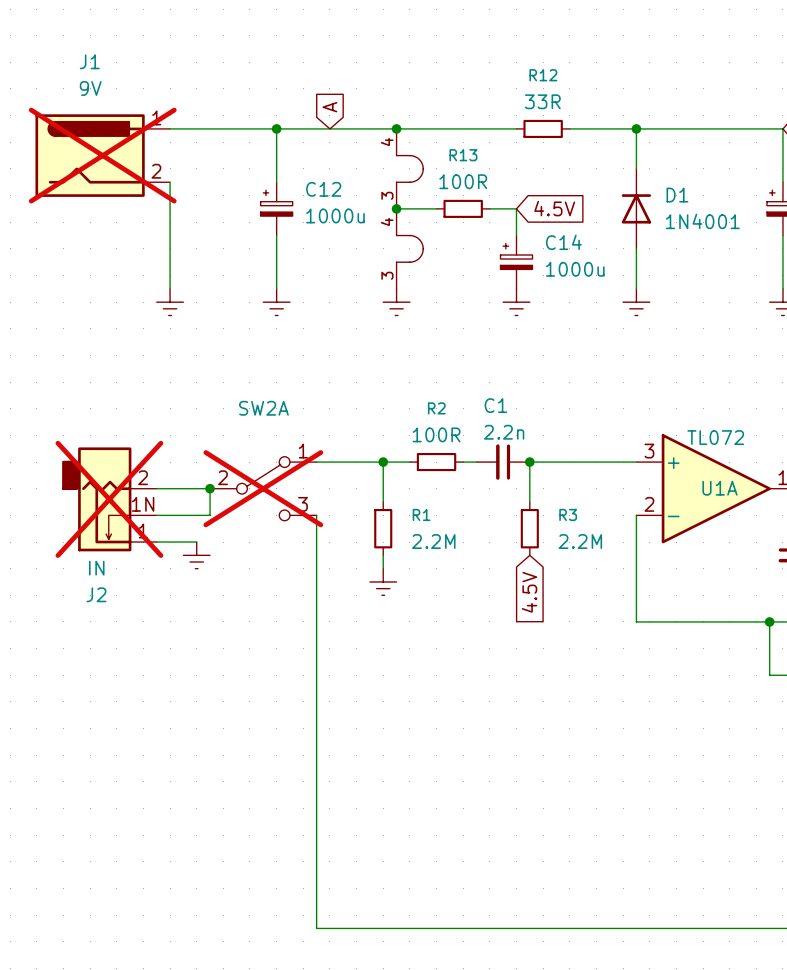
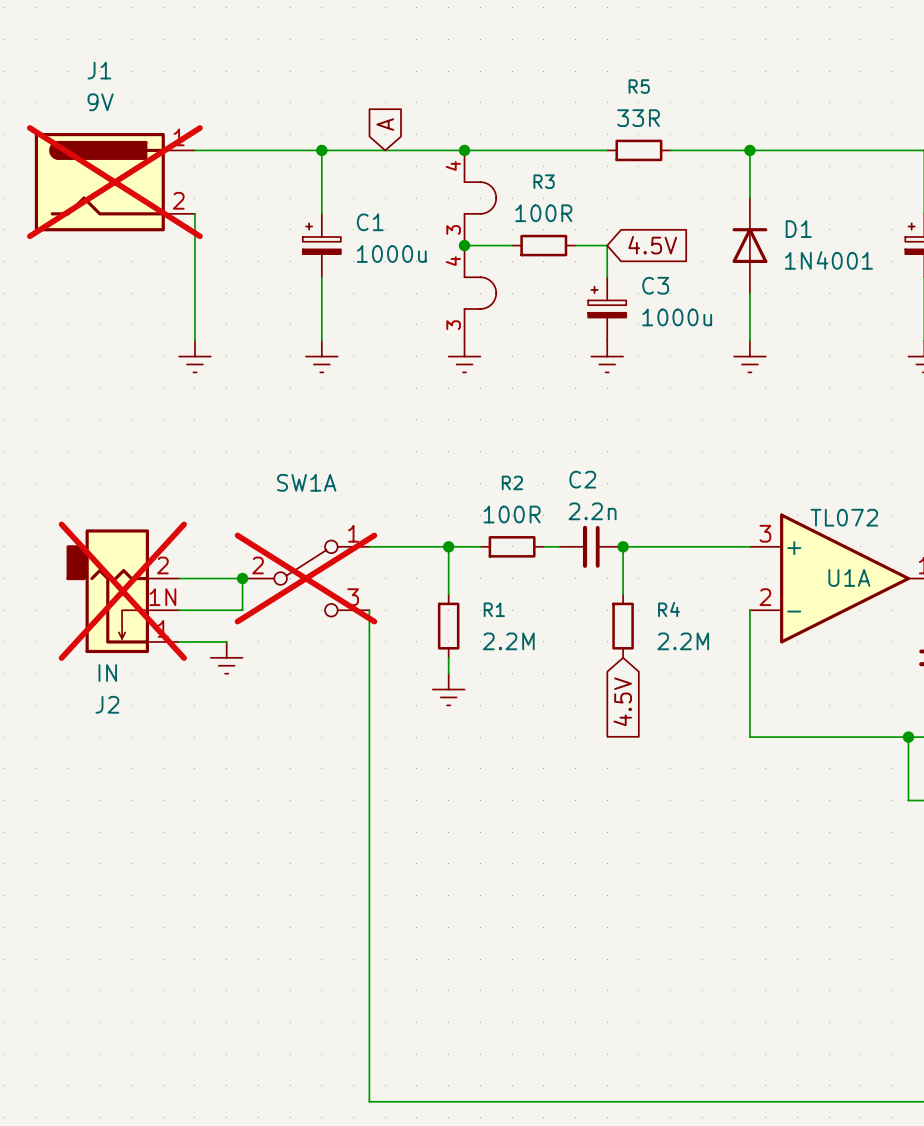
R12 name: R12 (543, 75) -> R5 (639, 86)
R13 name: R13 (463, 155) -> R3 (544, 181)
C12 name: C12 (323, 189) -> C1 (370, 222)
C14 name: C14 (563, 242) -> C3 (655, 285)
C1 name: C1 (495, 405) -> C2 (582, 479)
SW2A name: SW2A (263, 408) -> SW1A (306, 482)
R3 name: R3 (568, 514) -> R4 (669, 609)

